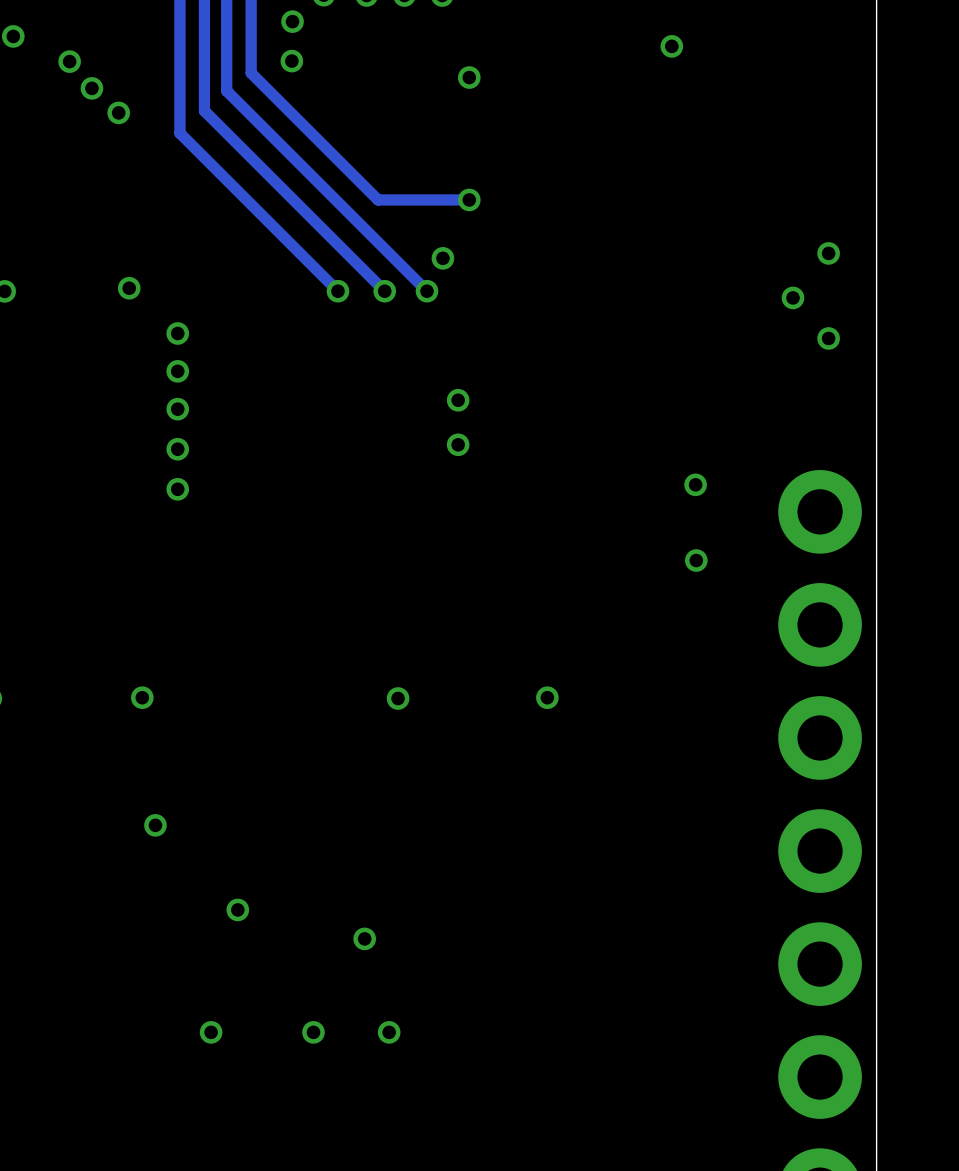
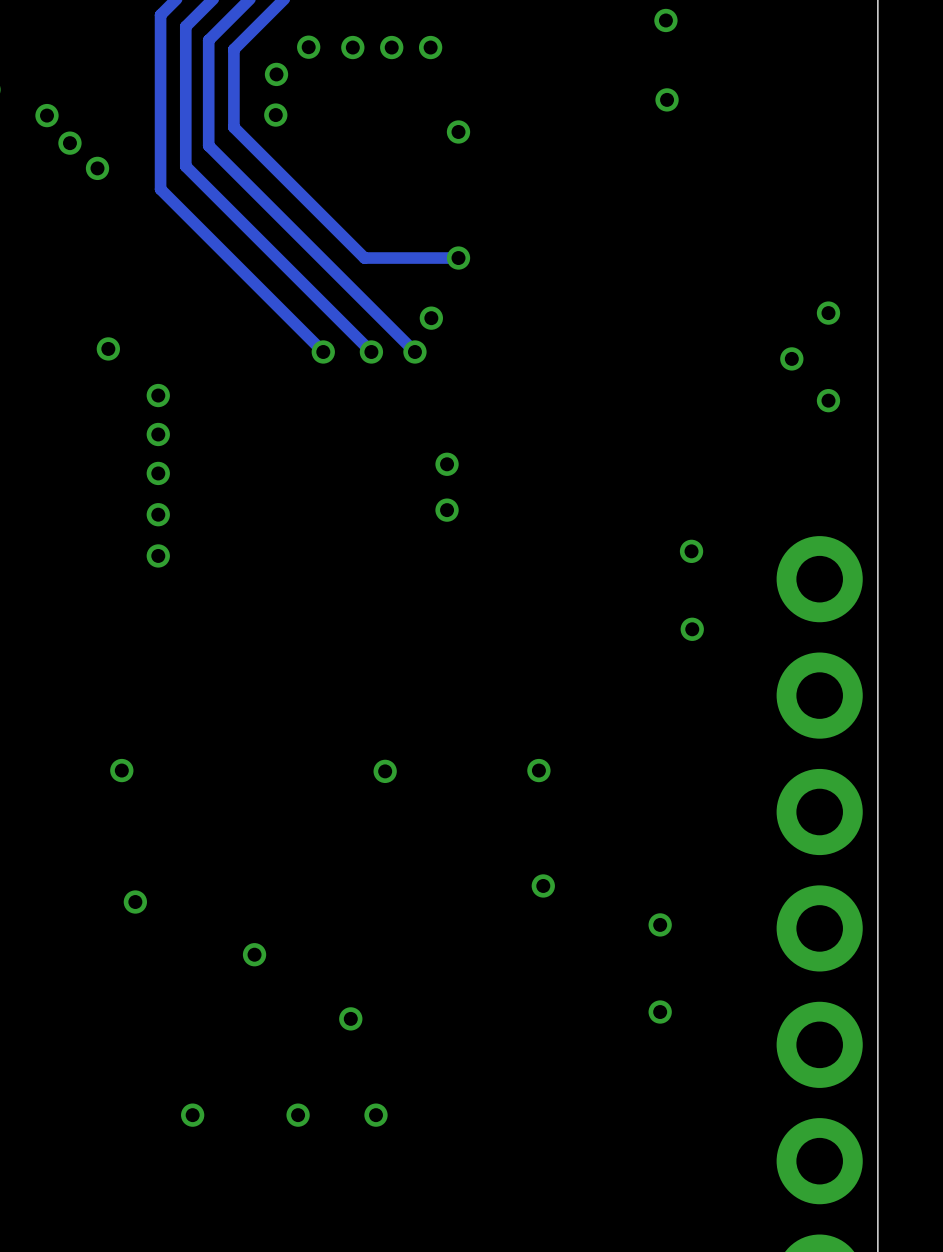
via: none -> (543, 885)
via: none -> (660, 924)
via position: (237, 909) -> (254, 954)
via: none -> (660, 1012)

